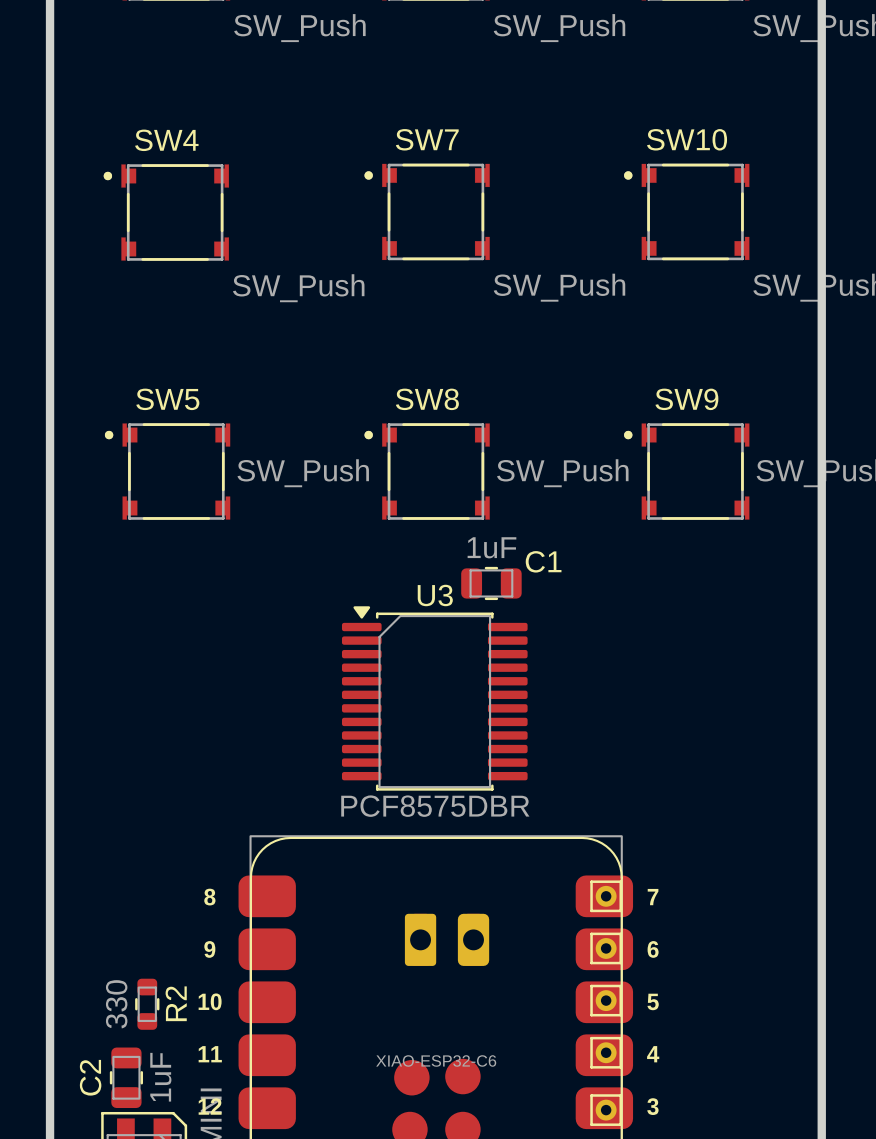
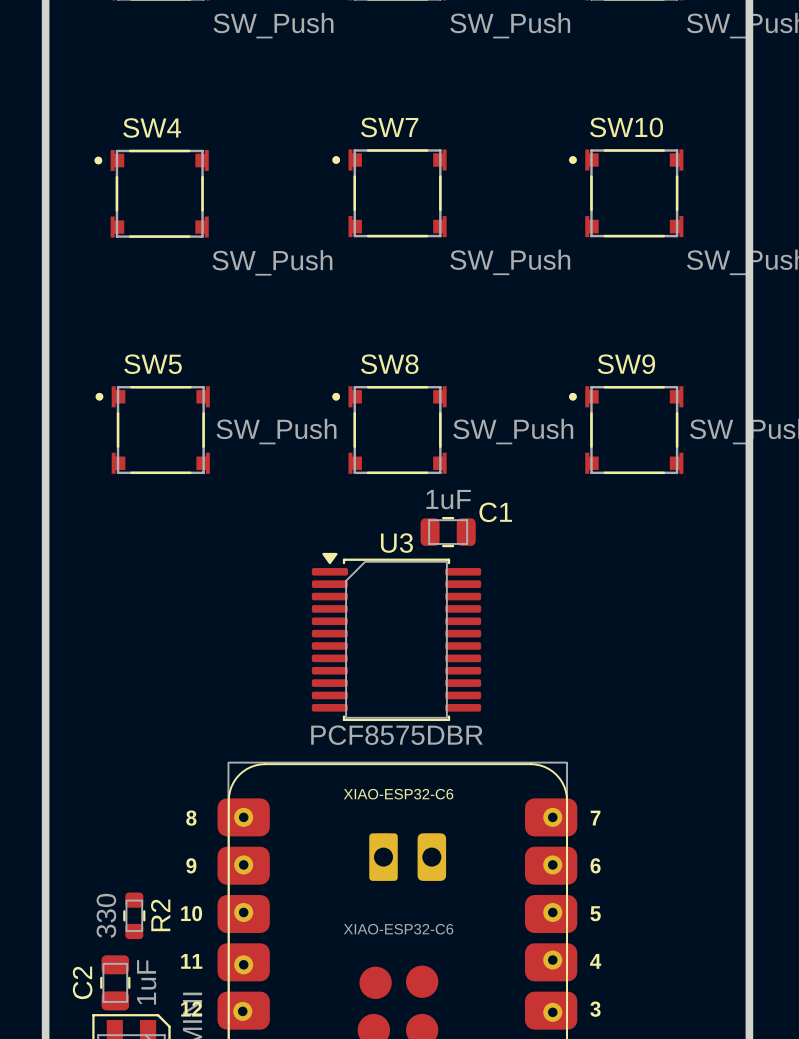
text: none -> XIAO-ESP32-C6 (398, 794)
part: none -> (243, 817)
part side: top (606, 896) -> bottom (552, 817)
part: none -> (243, 864)
part side: top (606, 948) -> bottom (552, 864)
part: none -> (243, 912)
part side: top (606, 1000) -> bottom (552, 912)
part side: top (606, 1052) -> bottom (552, 960)
part: none -> (243, 964)
part value position: XIAO-ESP32-C6 (436, 1060) -> XIAO-ESP32-C6 (398, 929)
part: none -> (242, 1011)
part side: top (606, 1110) -> bottom (552, 1012)

